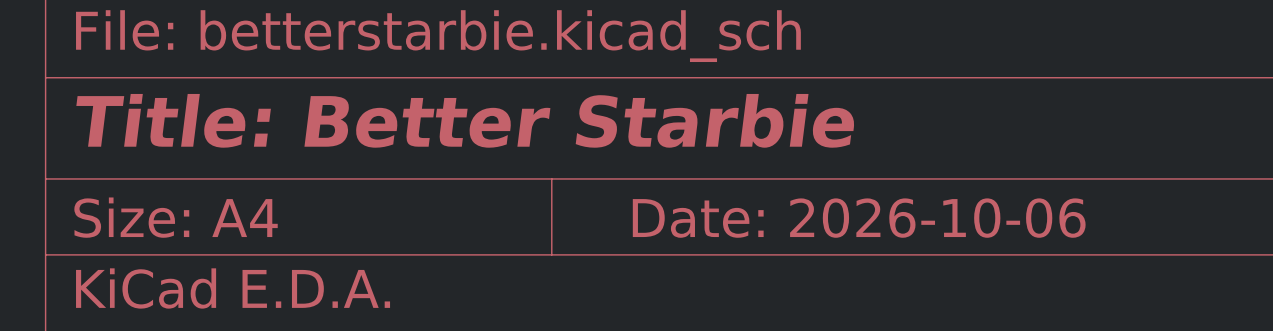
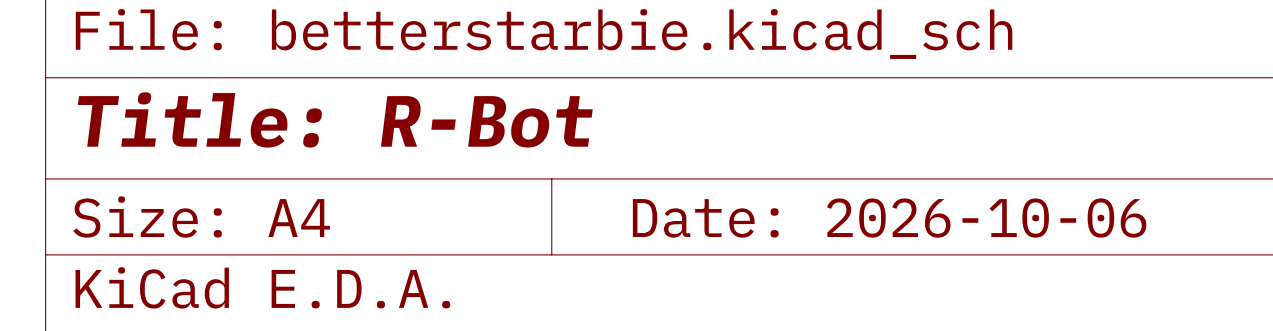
title block: Title: Better Starbie (465, 120) -> Title: R-Bot (335, 119)

